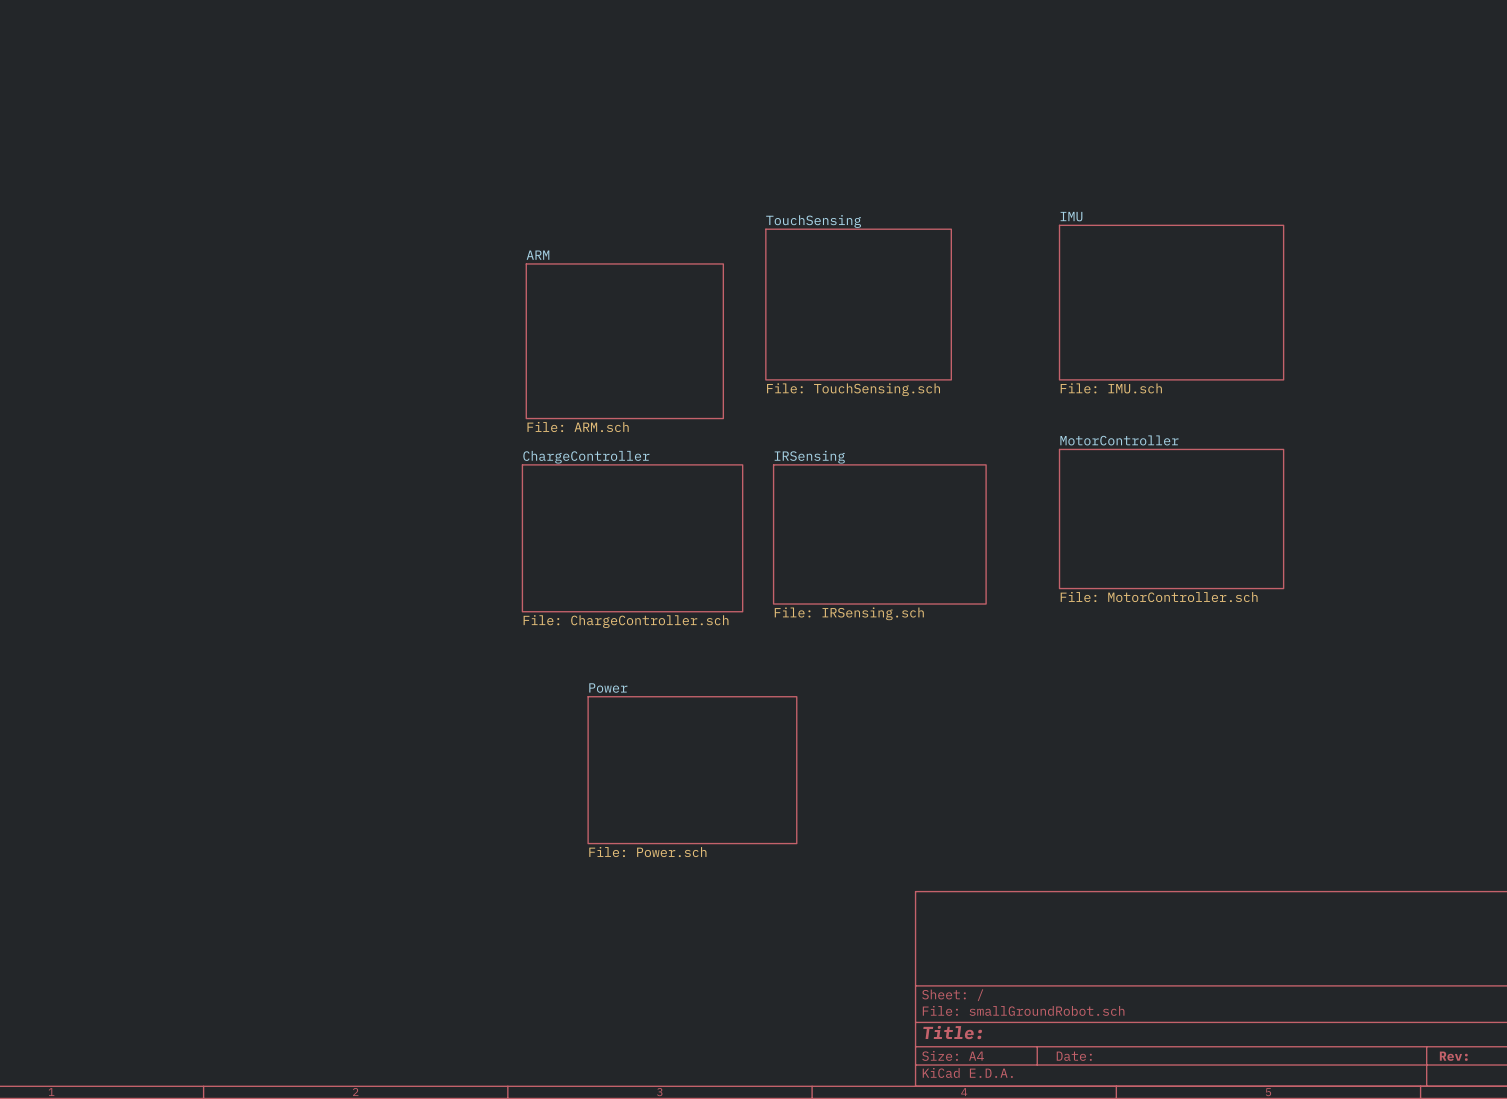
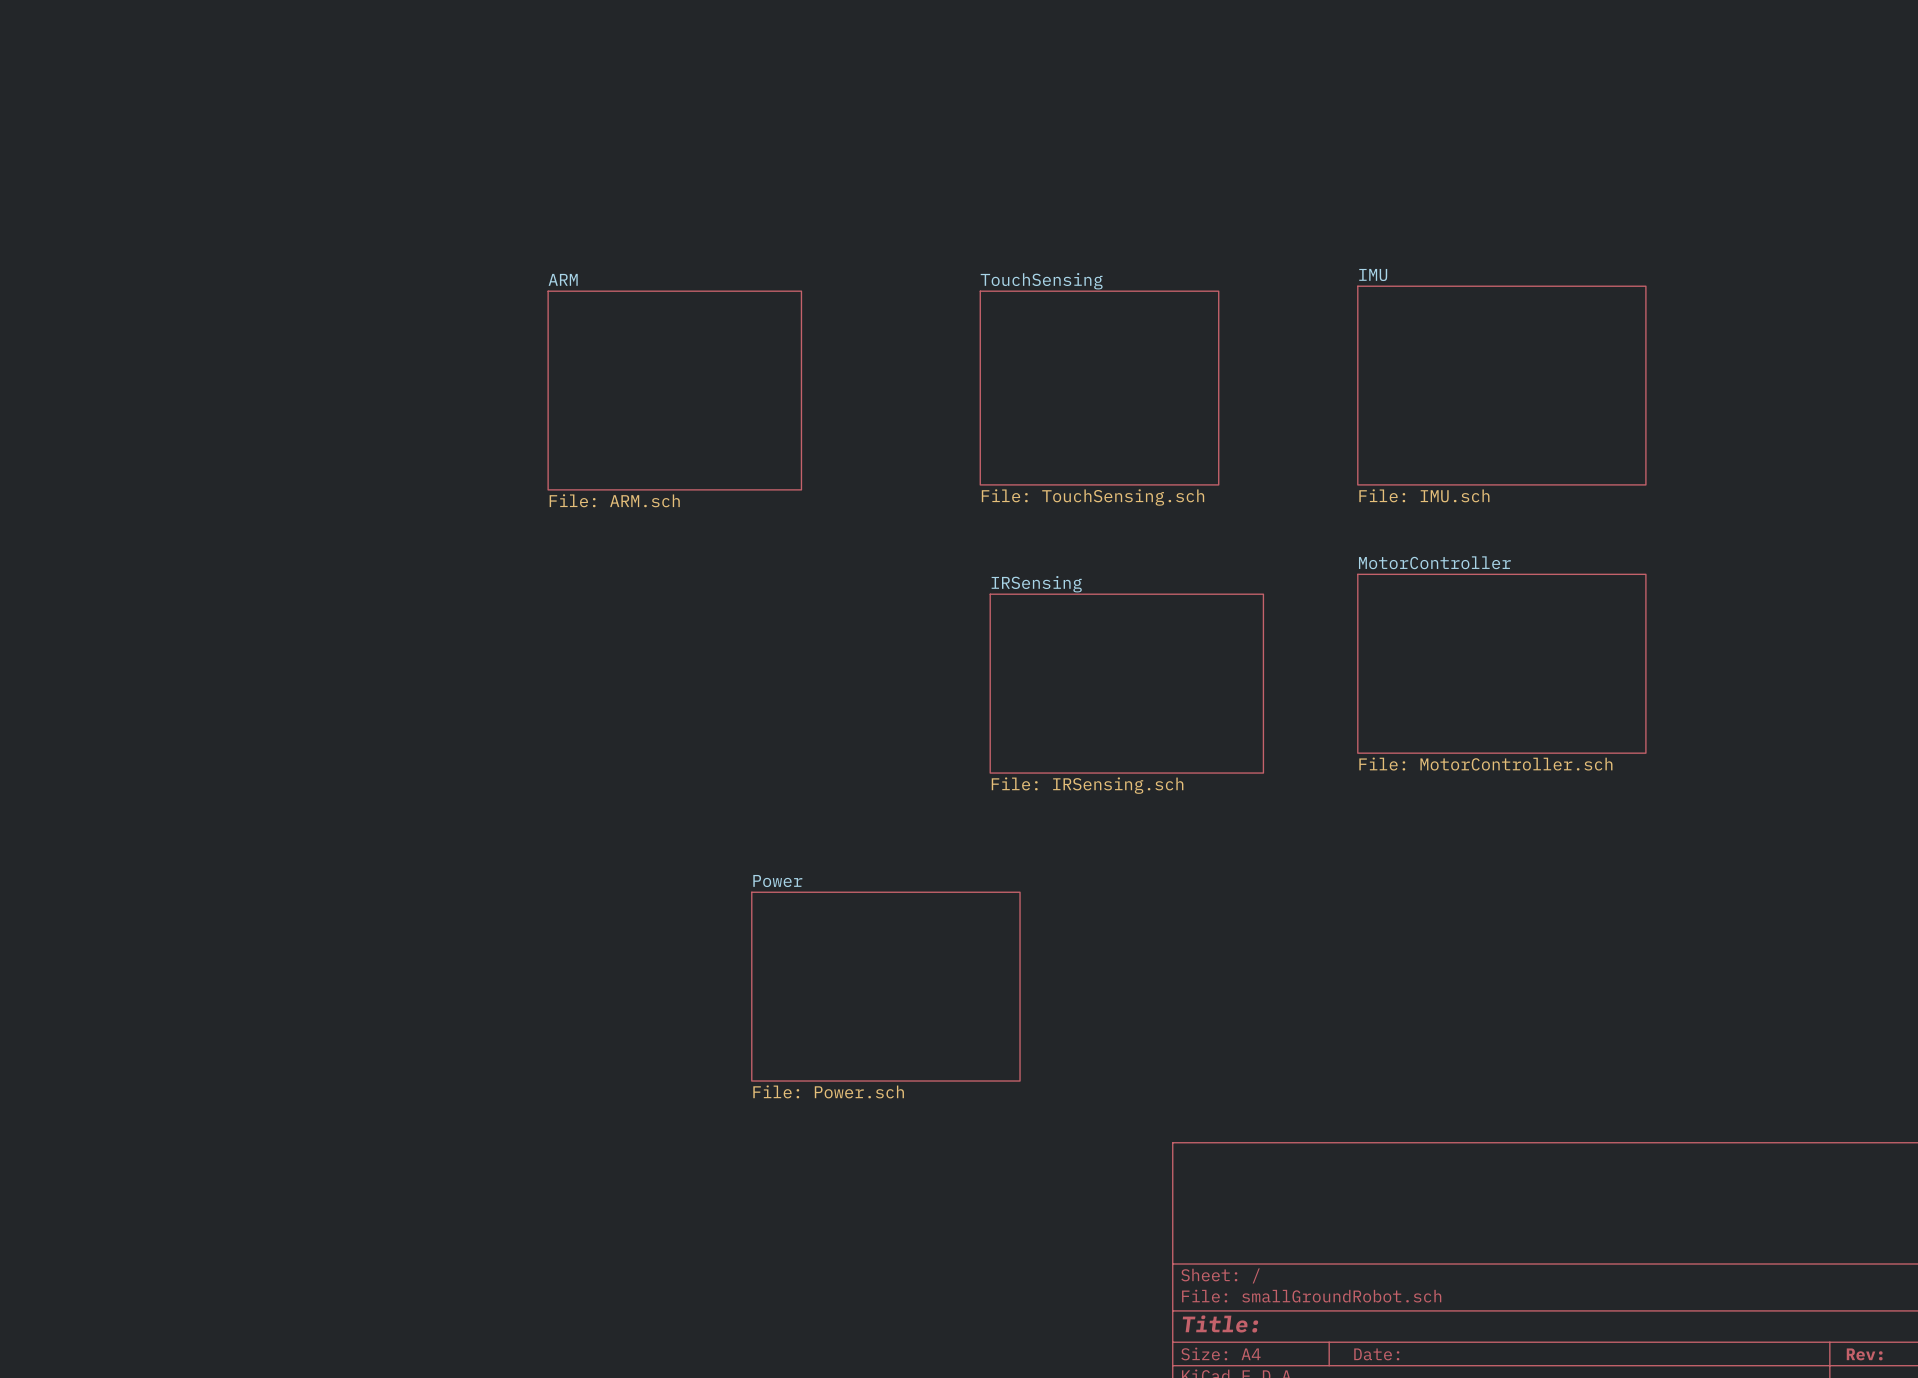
sheet ARM position: (624, 341) -> (674, 390)
sheet ChargeController: File: ChargeController.sch (632, 538) -> none

